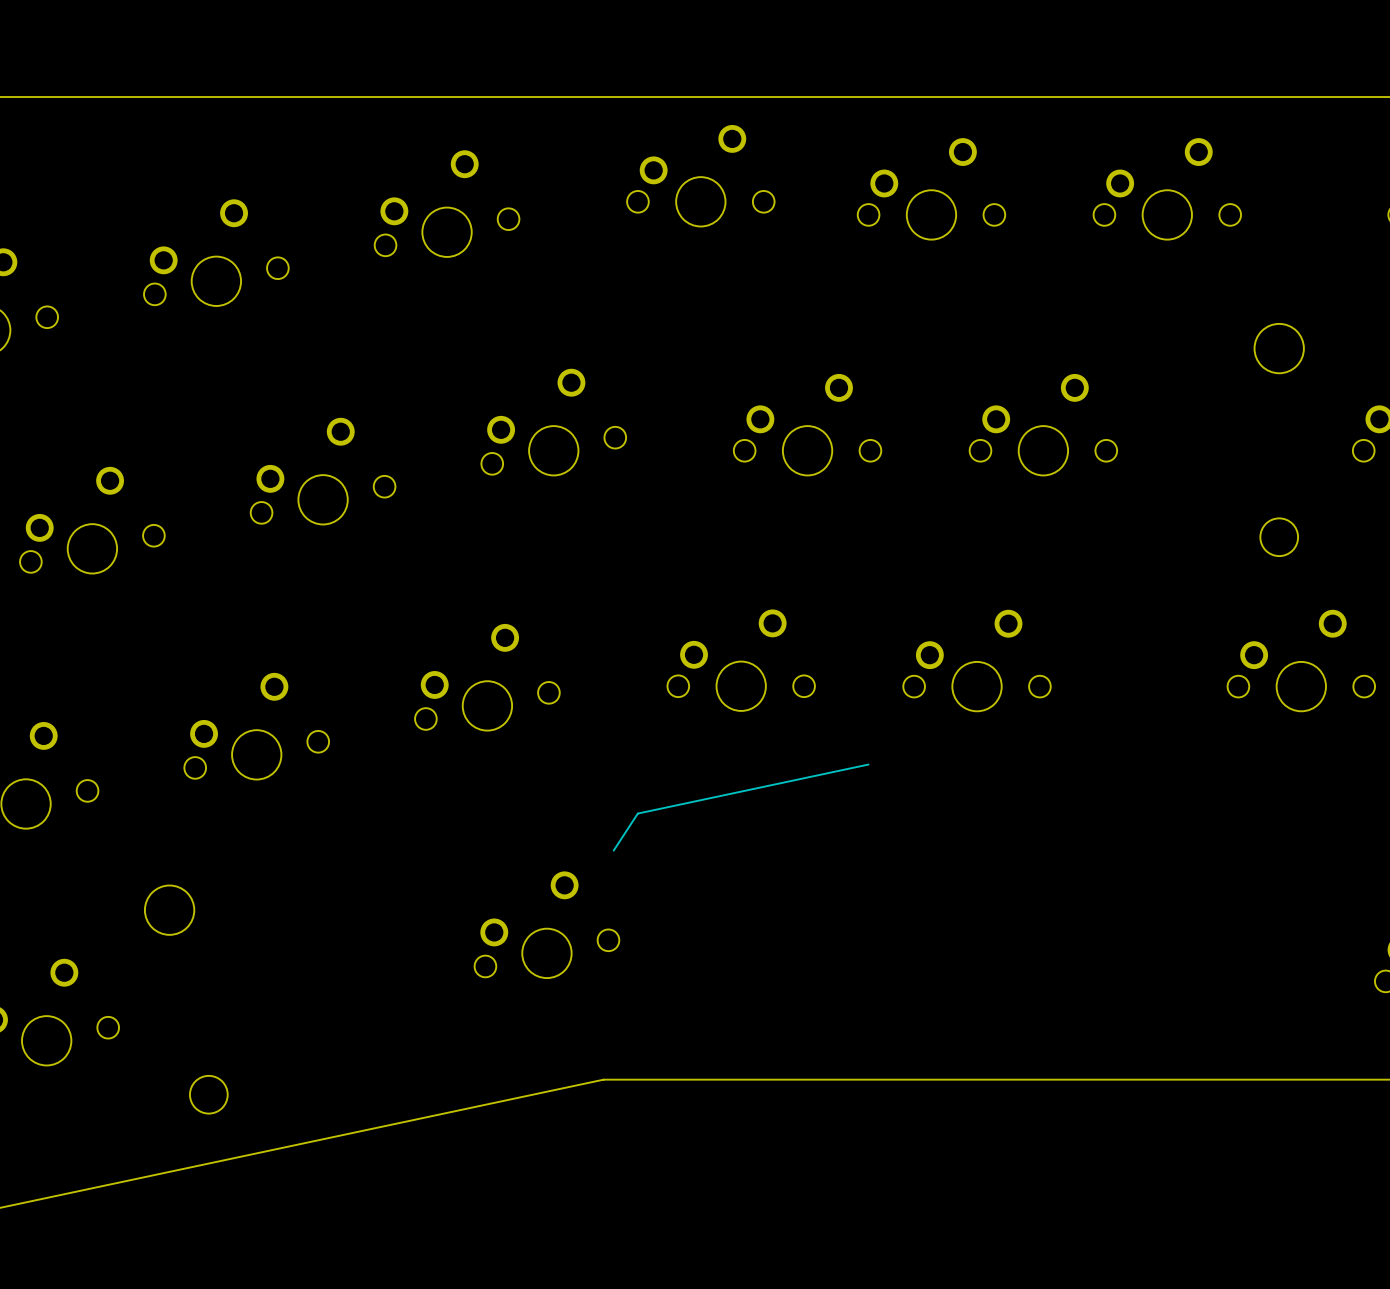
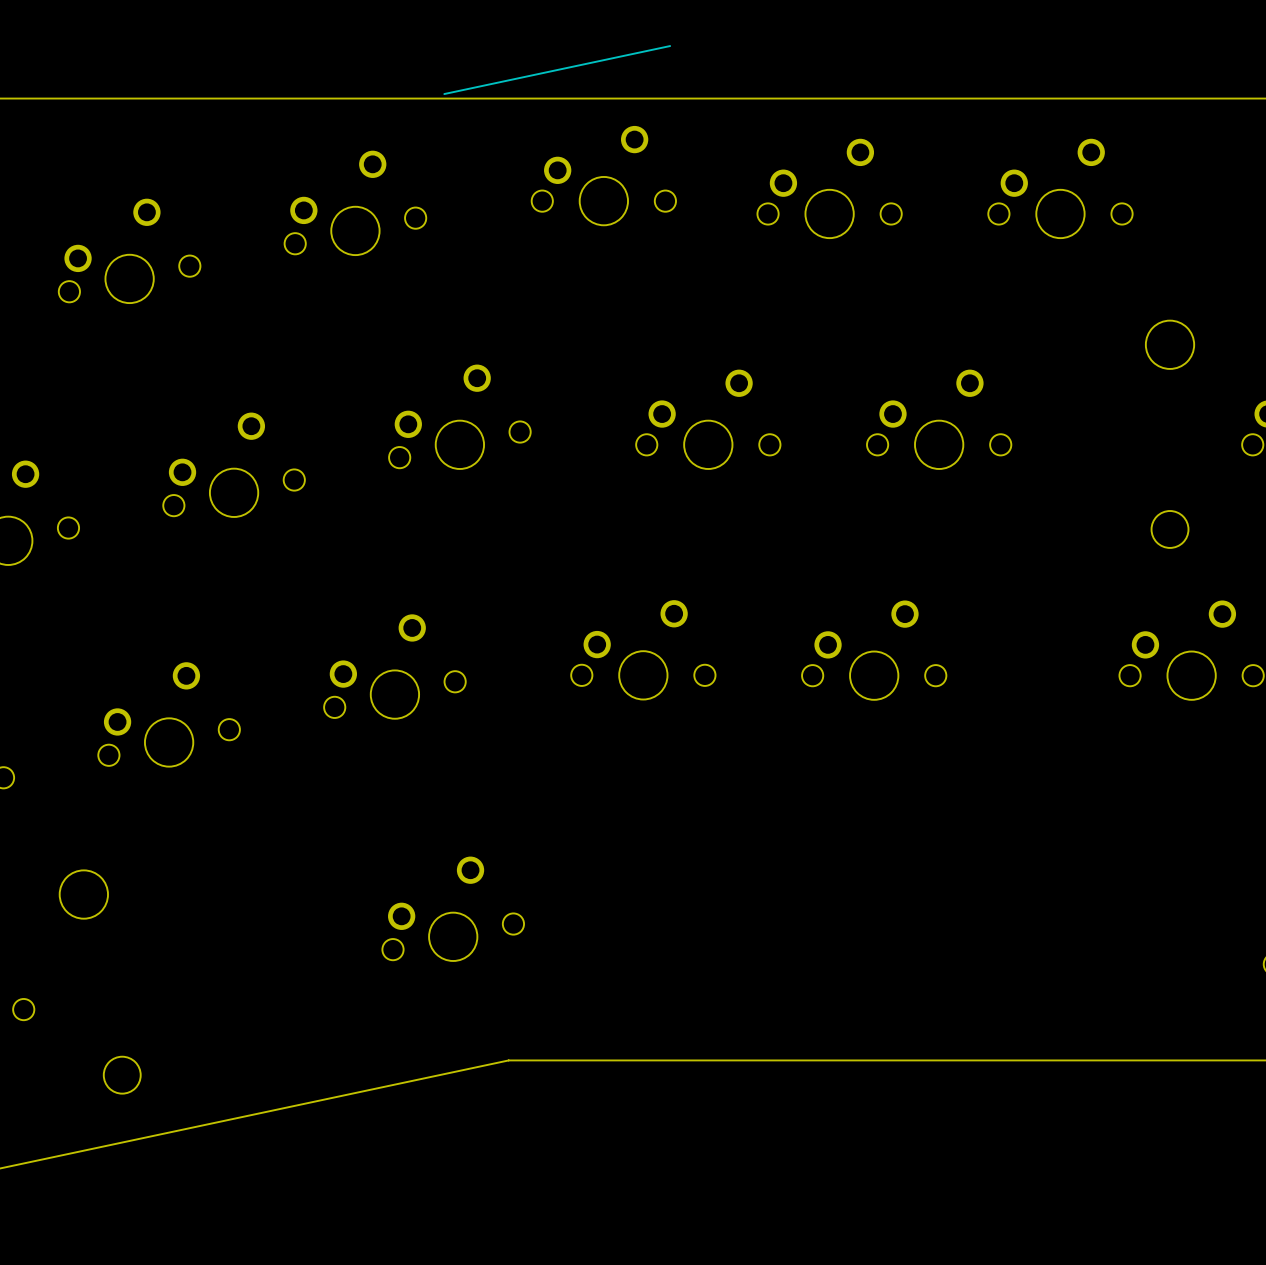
line: none -> (670, 46) (444, 94)
line: (868, 764) (637, 813) (613, 850) -> none

